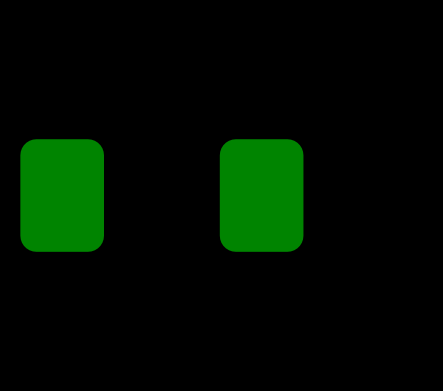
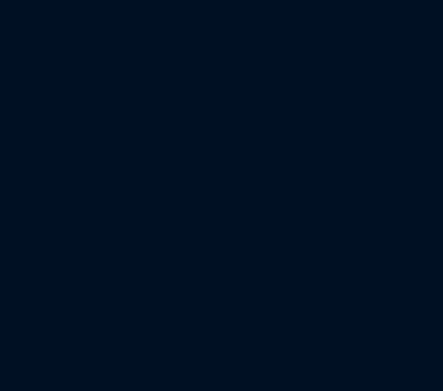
part: (161, 195) -> none

